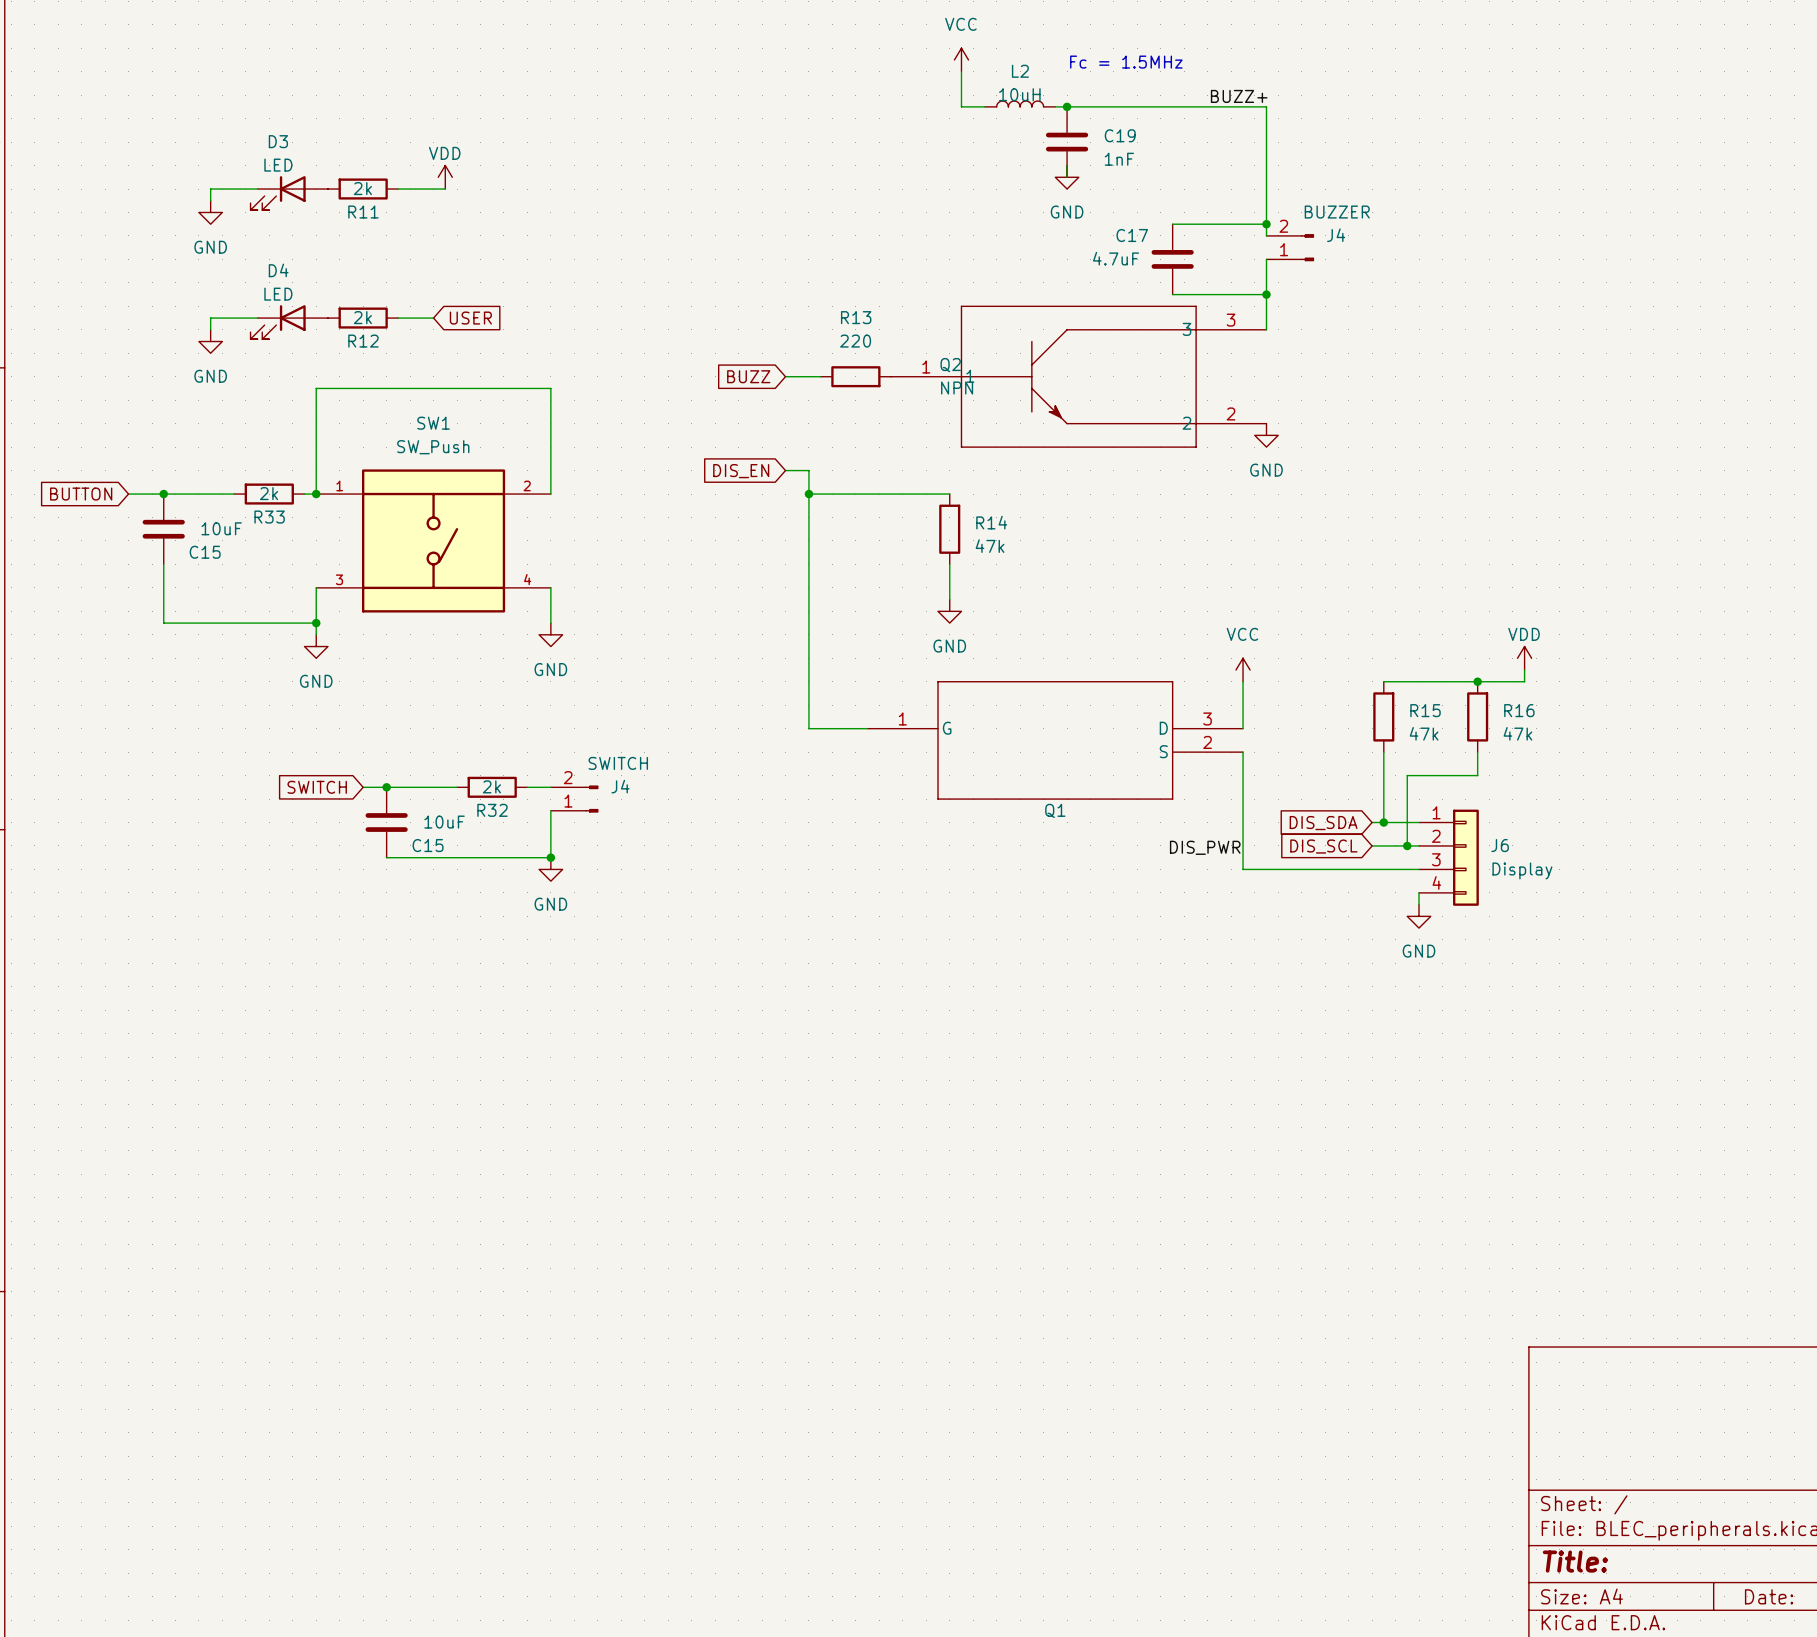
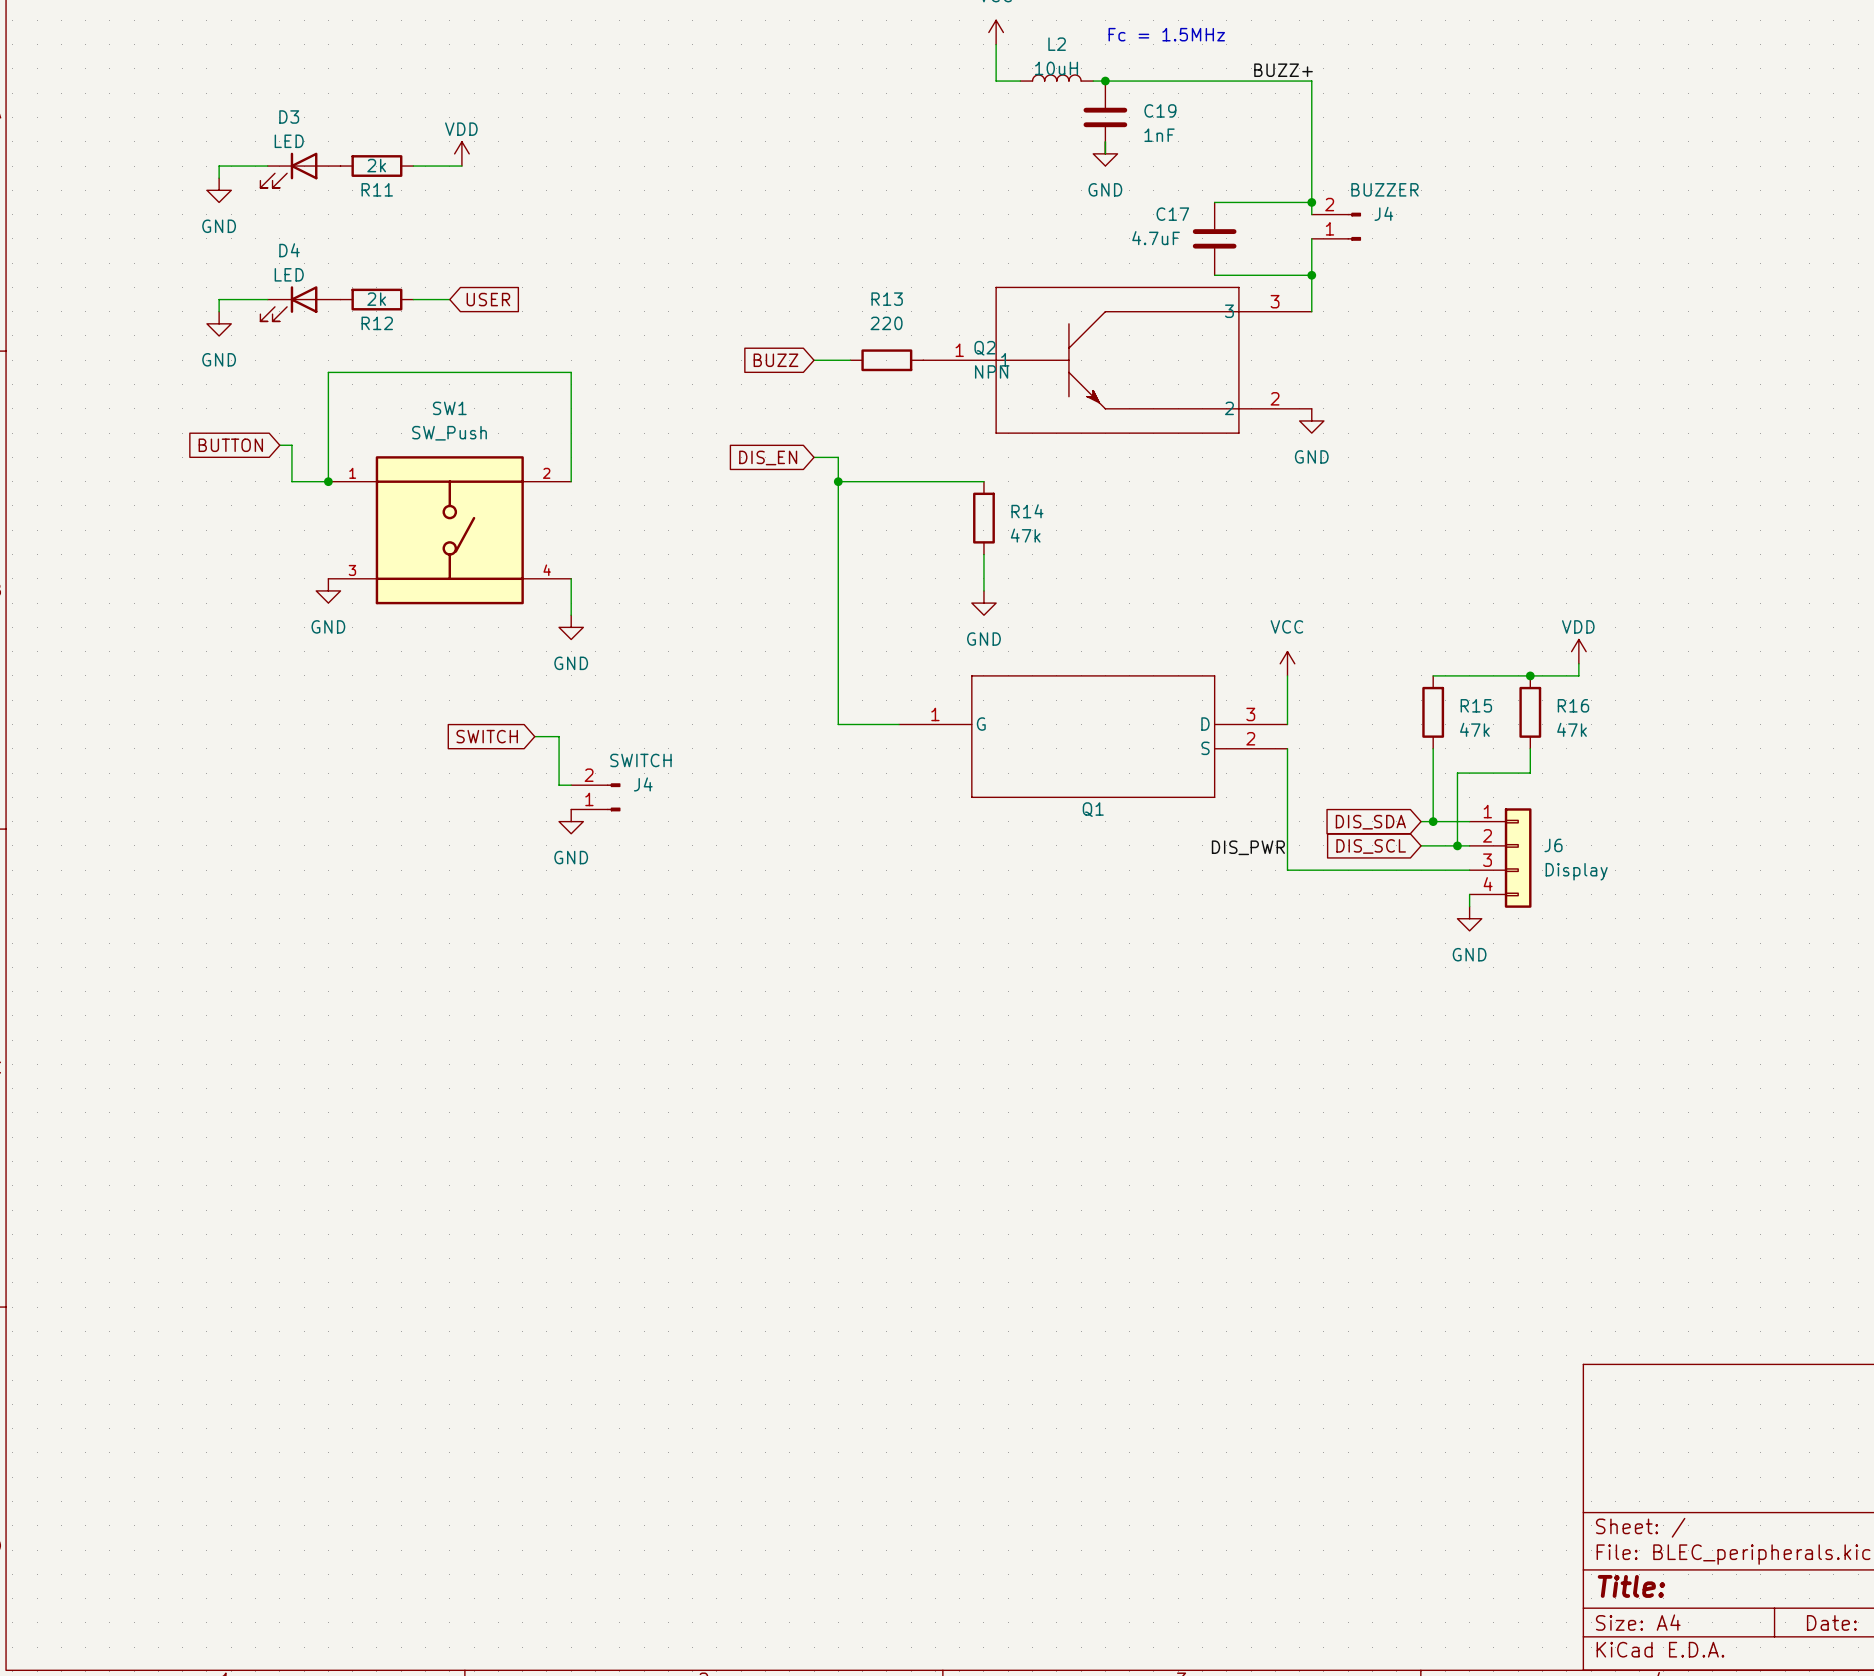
wire: none -> (279, 445) (291, 445) (291, 481) (316, 481)
global label position: BUTTON (81, 494) -> BUTTON (230, 445)
wire: (128, 494) (234, 494) -> none
junction: (163, 494) -> none
R33: 2k (269, 494) -> none
C15: 10uF (163, 529) -> none
wire: (163, 564) (163, 623) (316, 623) -> none
wire: (316, 587) (316, 634) -> none
junction: (316, 623) -> none
power symbol position: GND (316, 646) -> GND (328, 590)
global label position: SWITCH (317, 787) -> SWITCH (487, 736)
wire: (363, 787) (457, 787) -> none
junction: (386, 787) -> none
R32: 2k (492, 787) -> none
wire: (527, 787) (539, 787) -> (534, 736) (559, 736) (559, 785)
wire: (550, 810) (550, 857) (386, 857) -> none
C15: 10uF (386, 822) -> none
junction: (550, 857) -> none
power symbol position: GND (550, 869) -> GND (571, 821)

